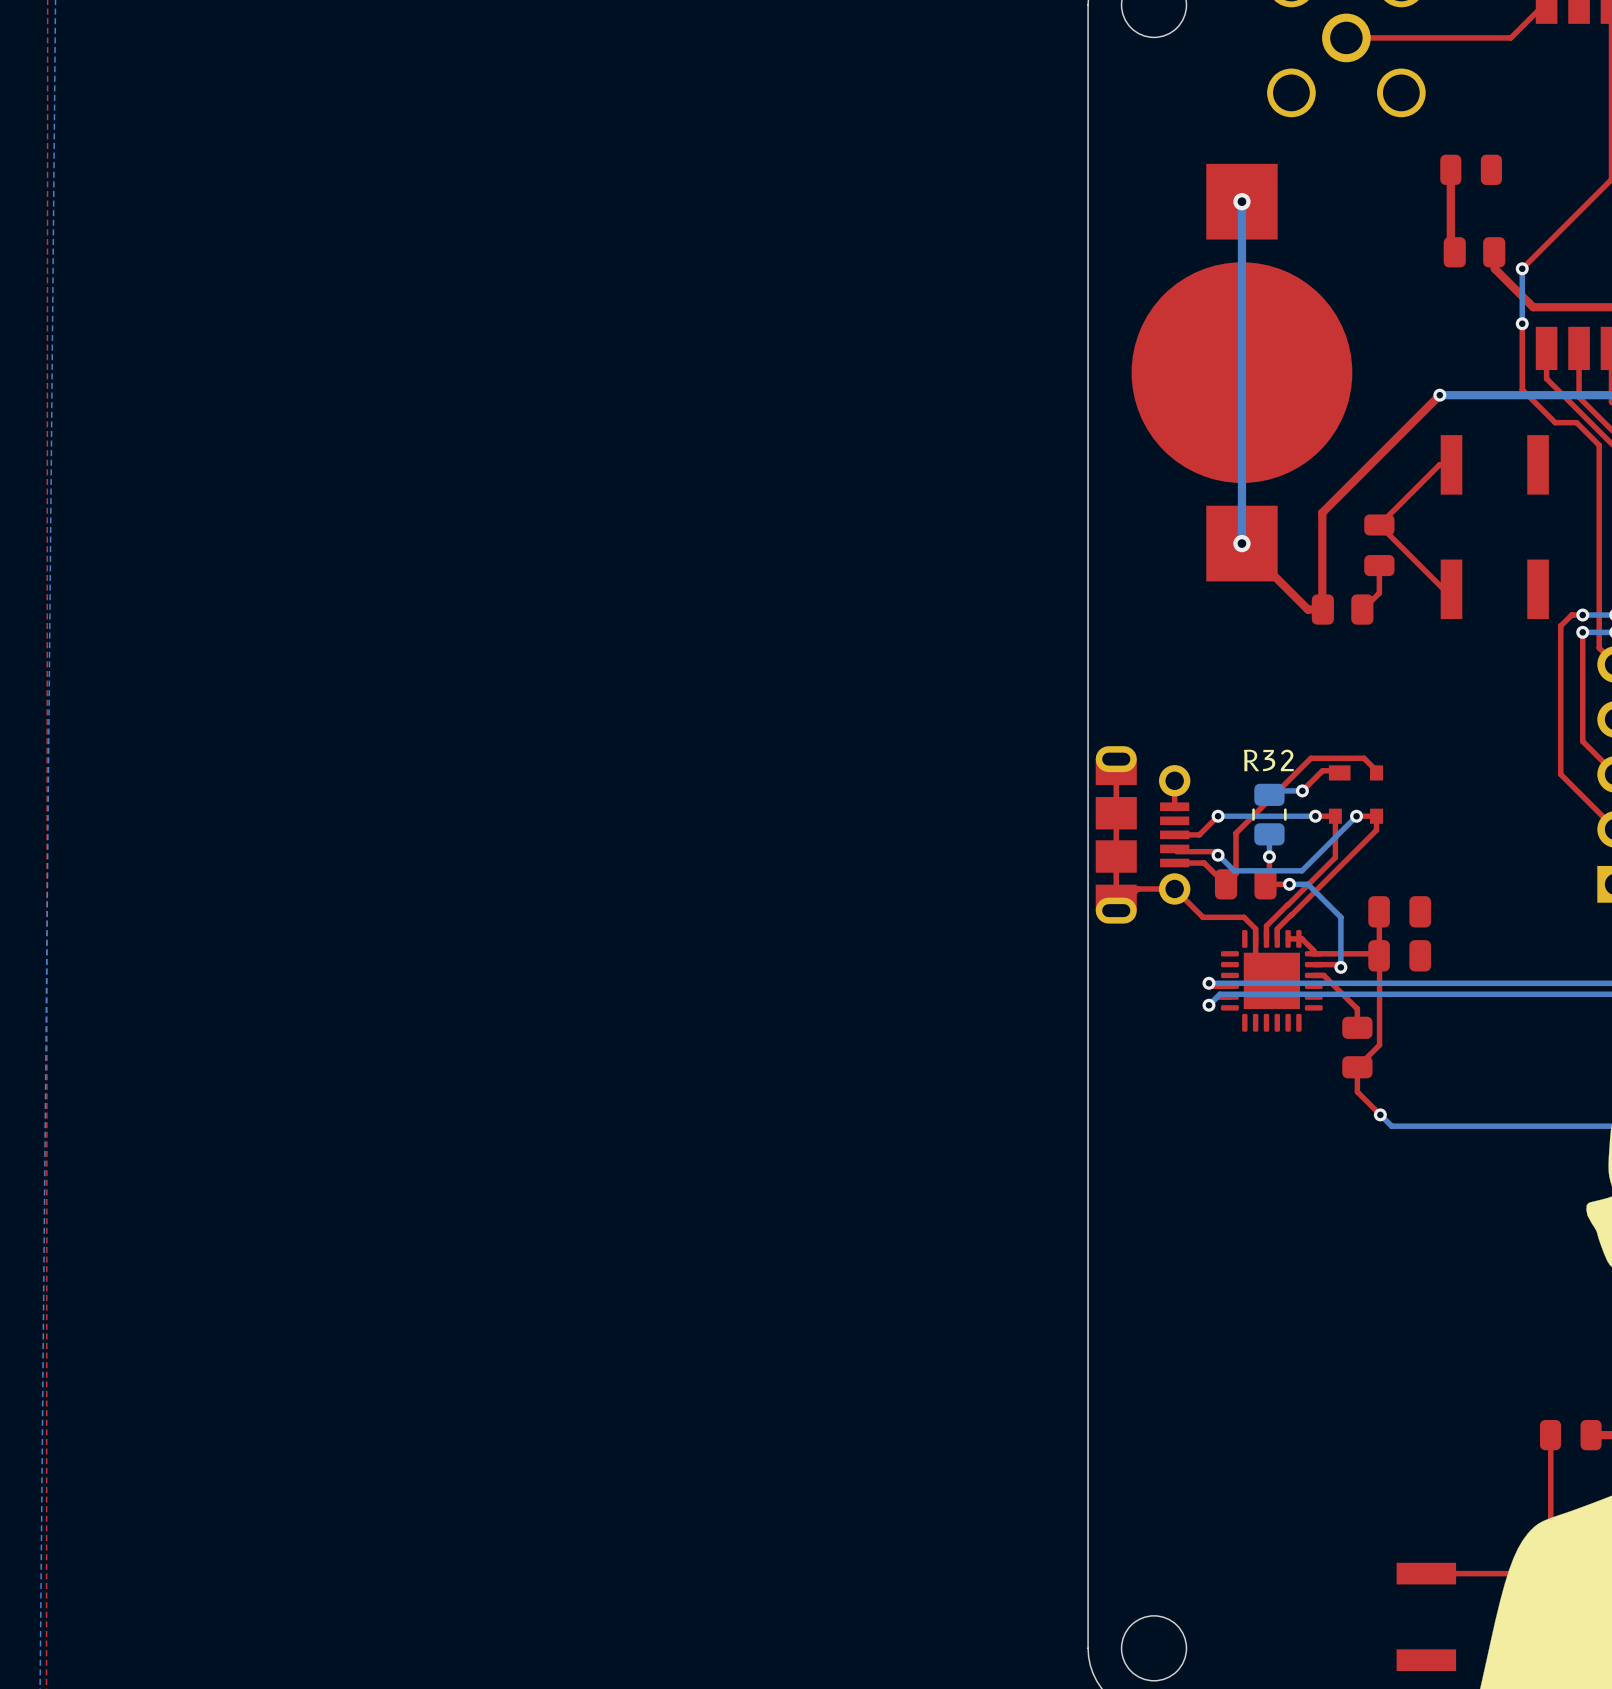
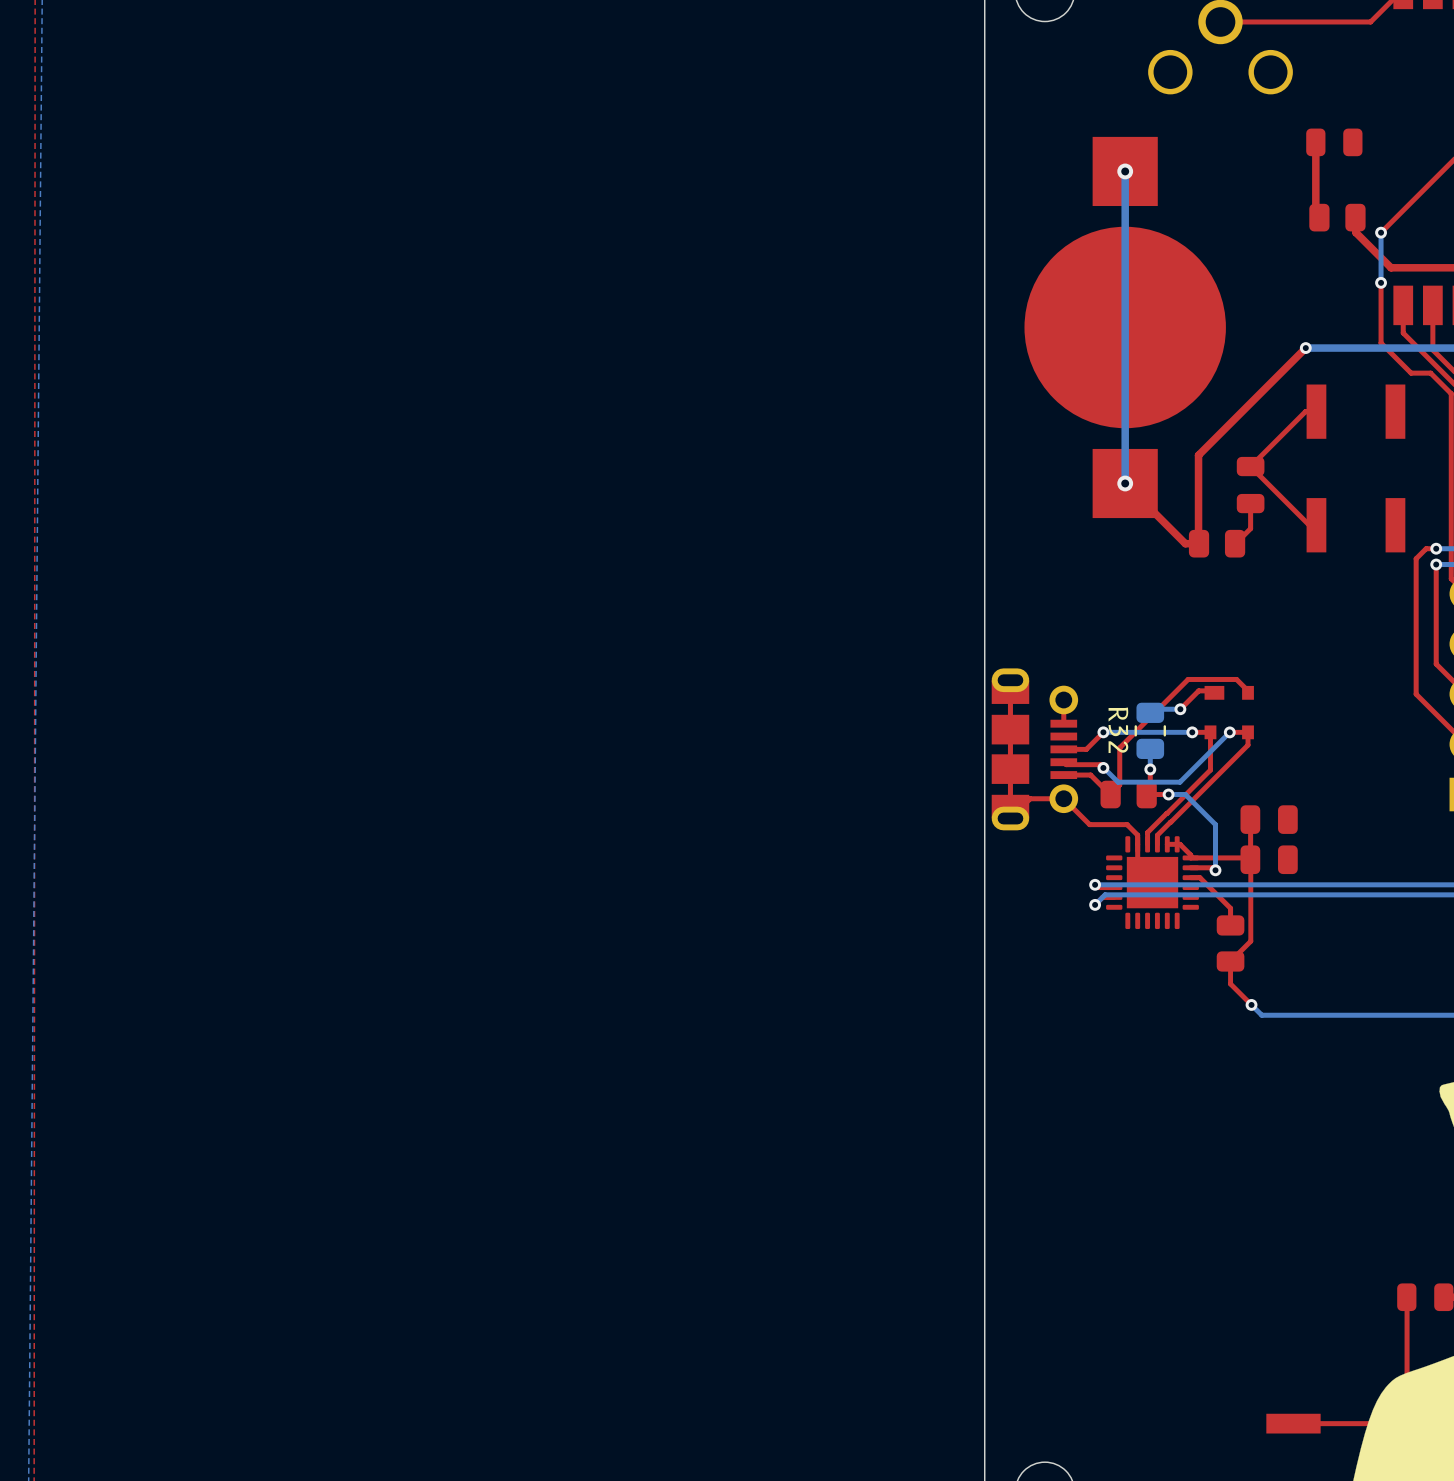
R32 name rotation: 0° (1268, 760) -> 90° clockwise (1118, 730)

